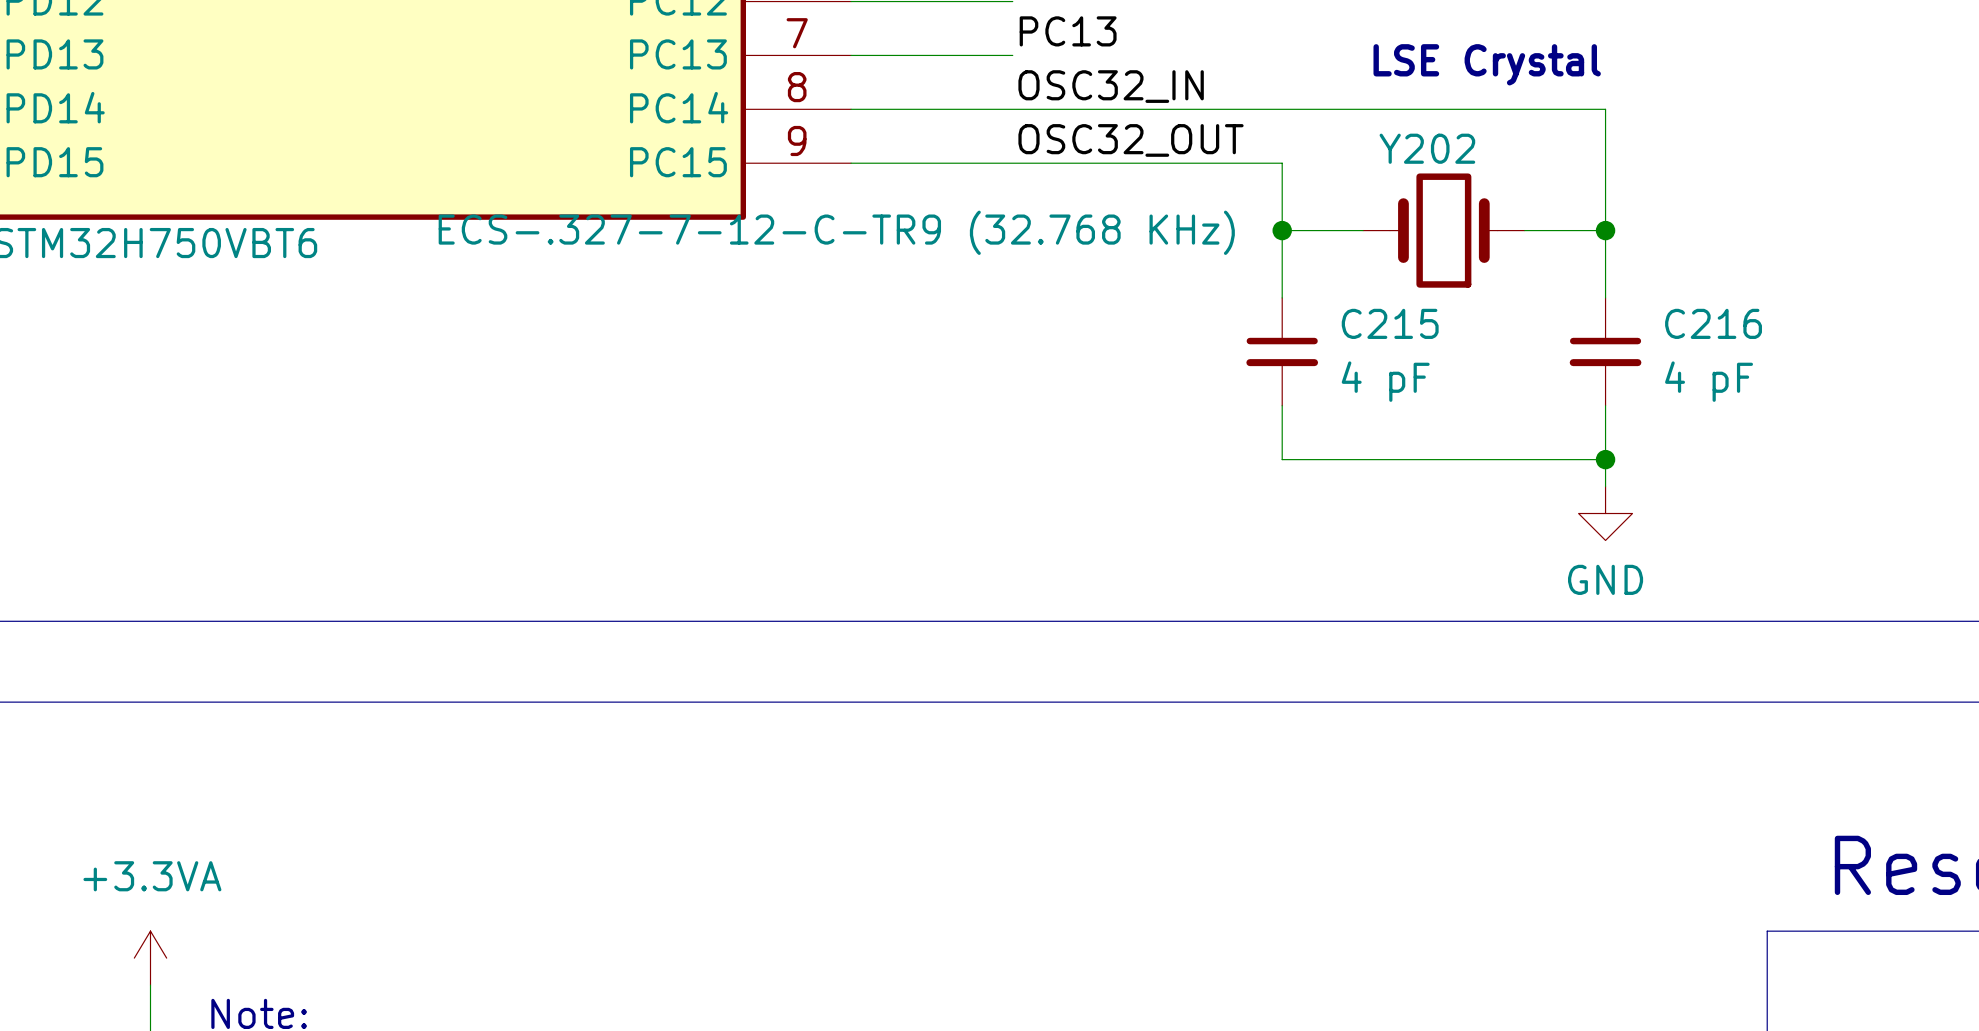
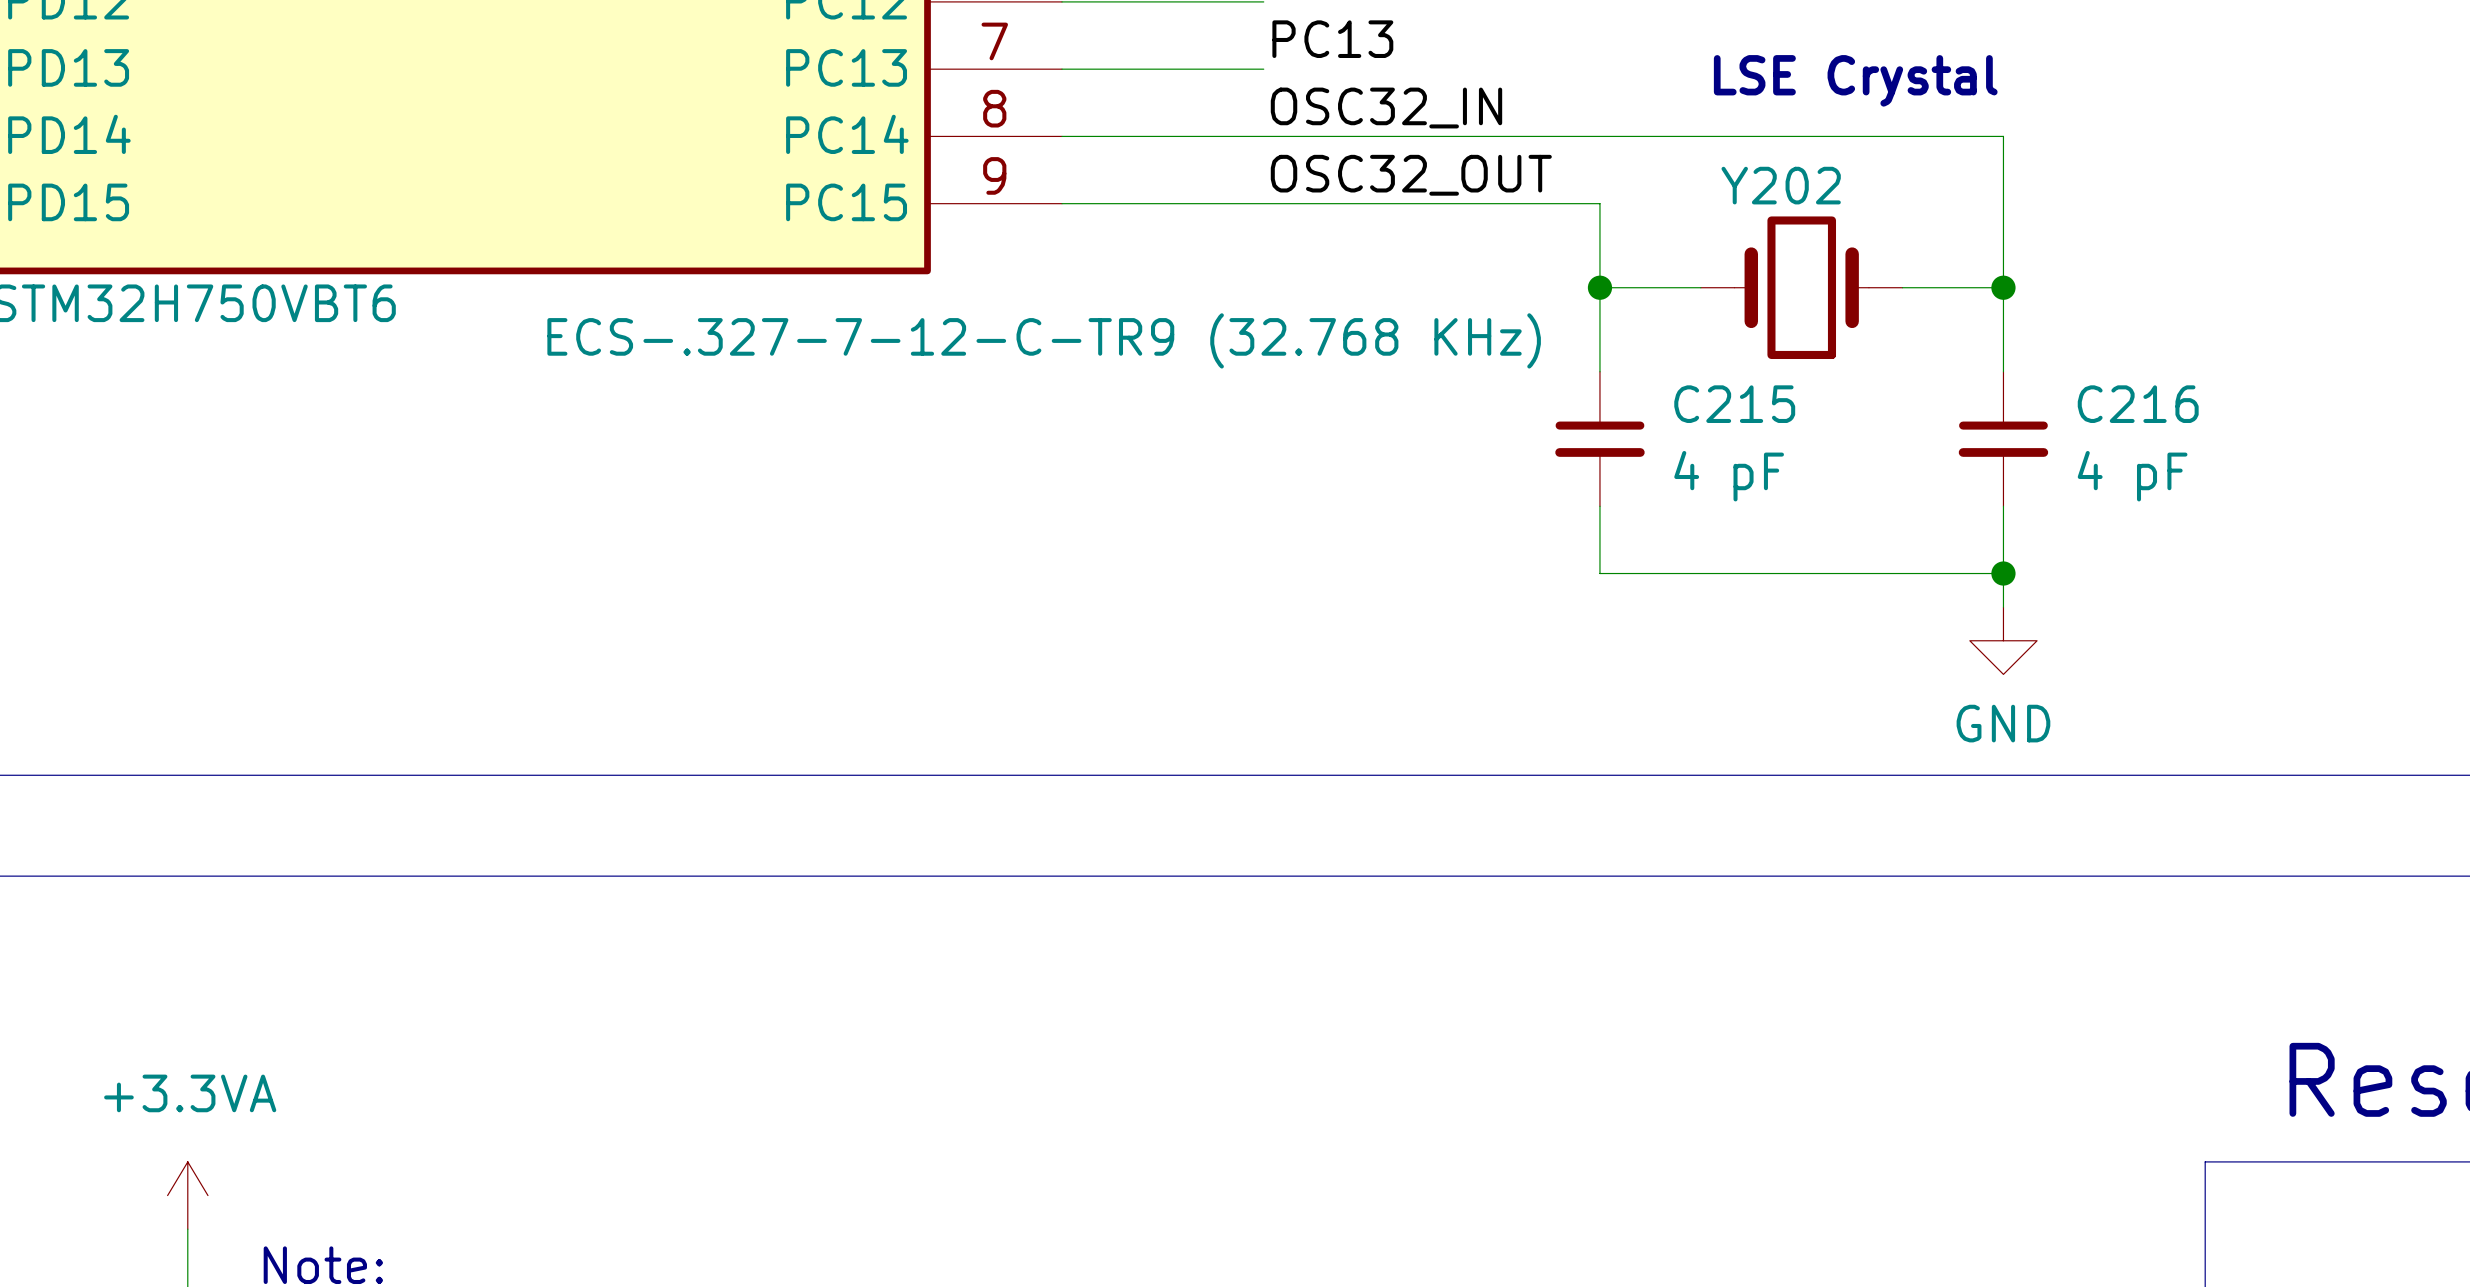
Y202 value position: ECS-.327-7-12-C-TR9 (32.768 KHz) (836, 232) -> ECS-.327-7-12-C-TR9 (32.768 KHz) (1044, 340)

